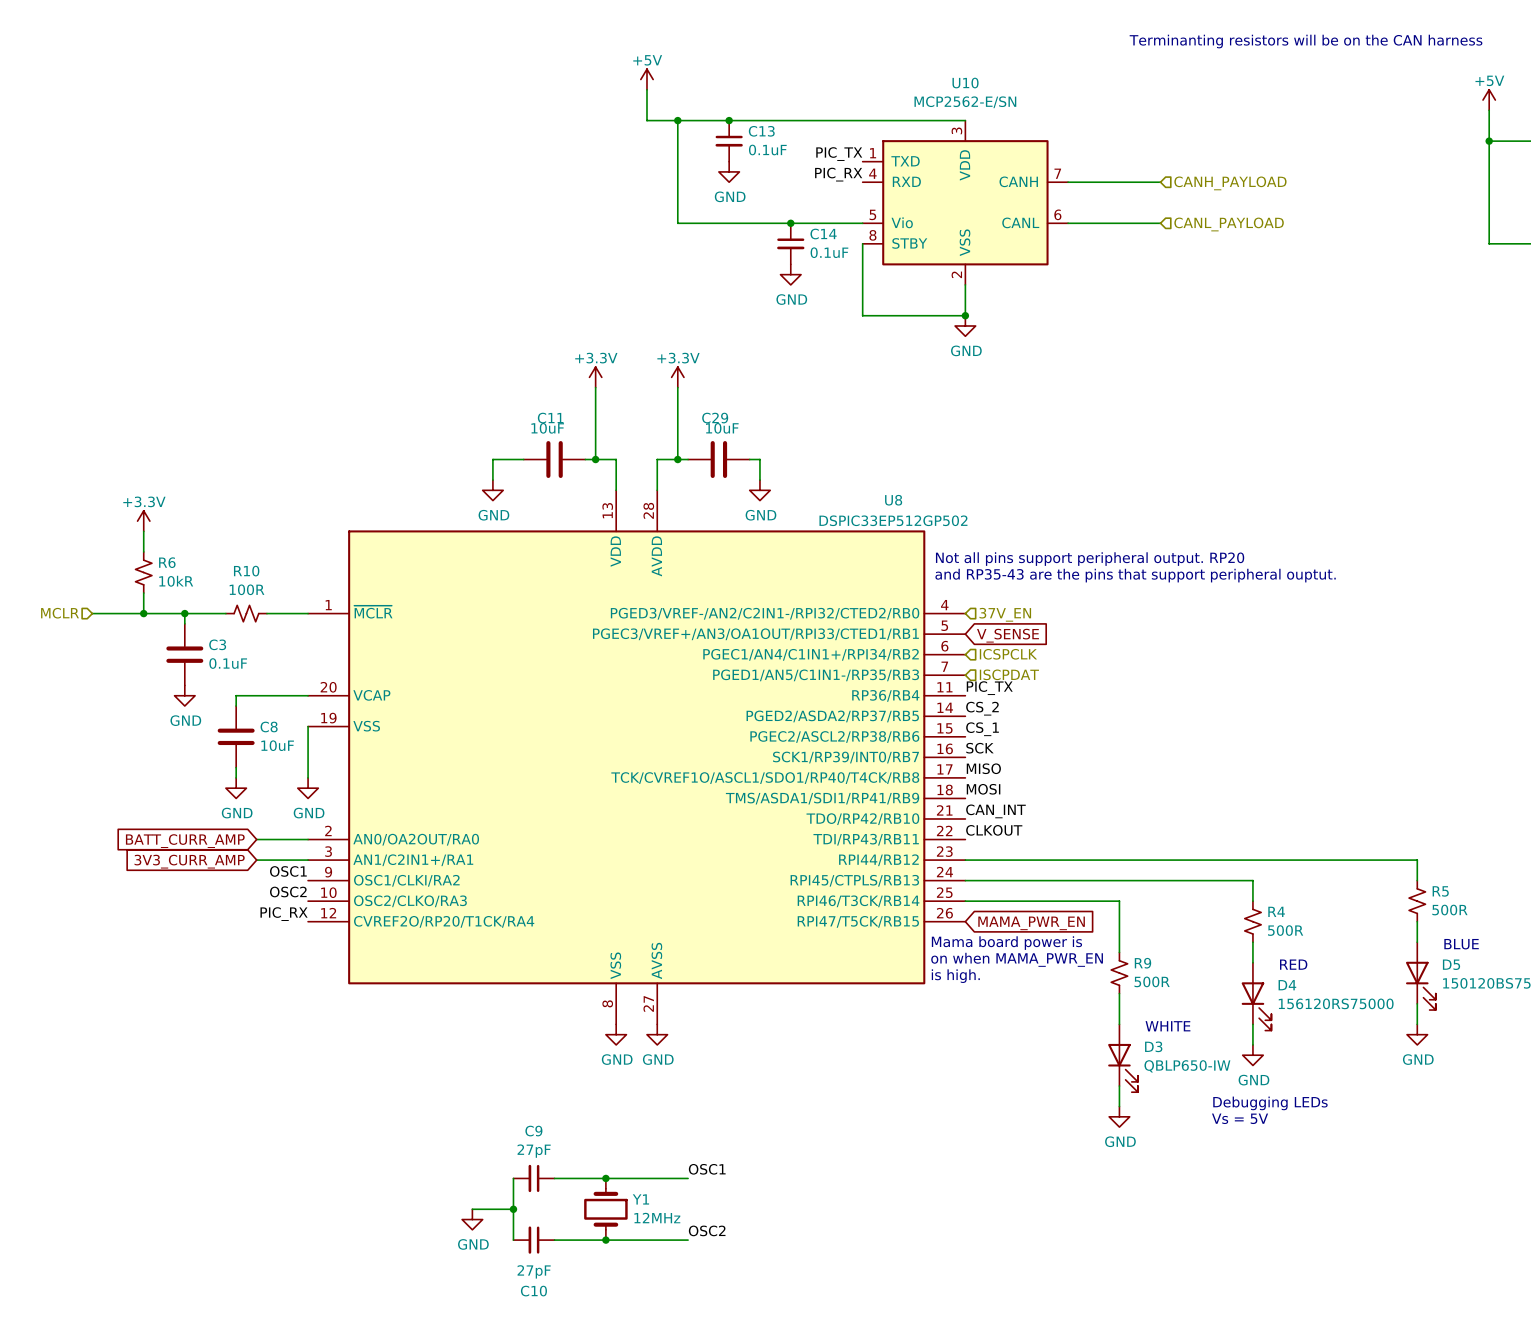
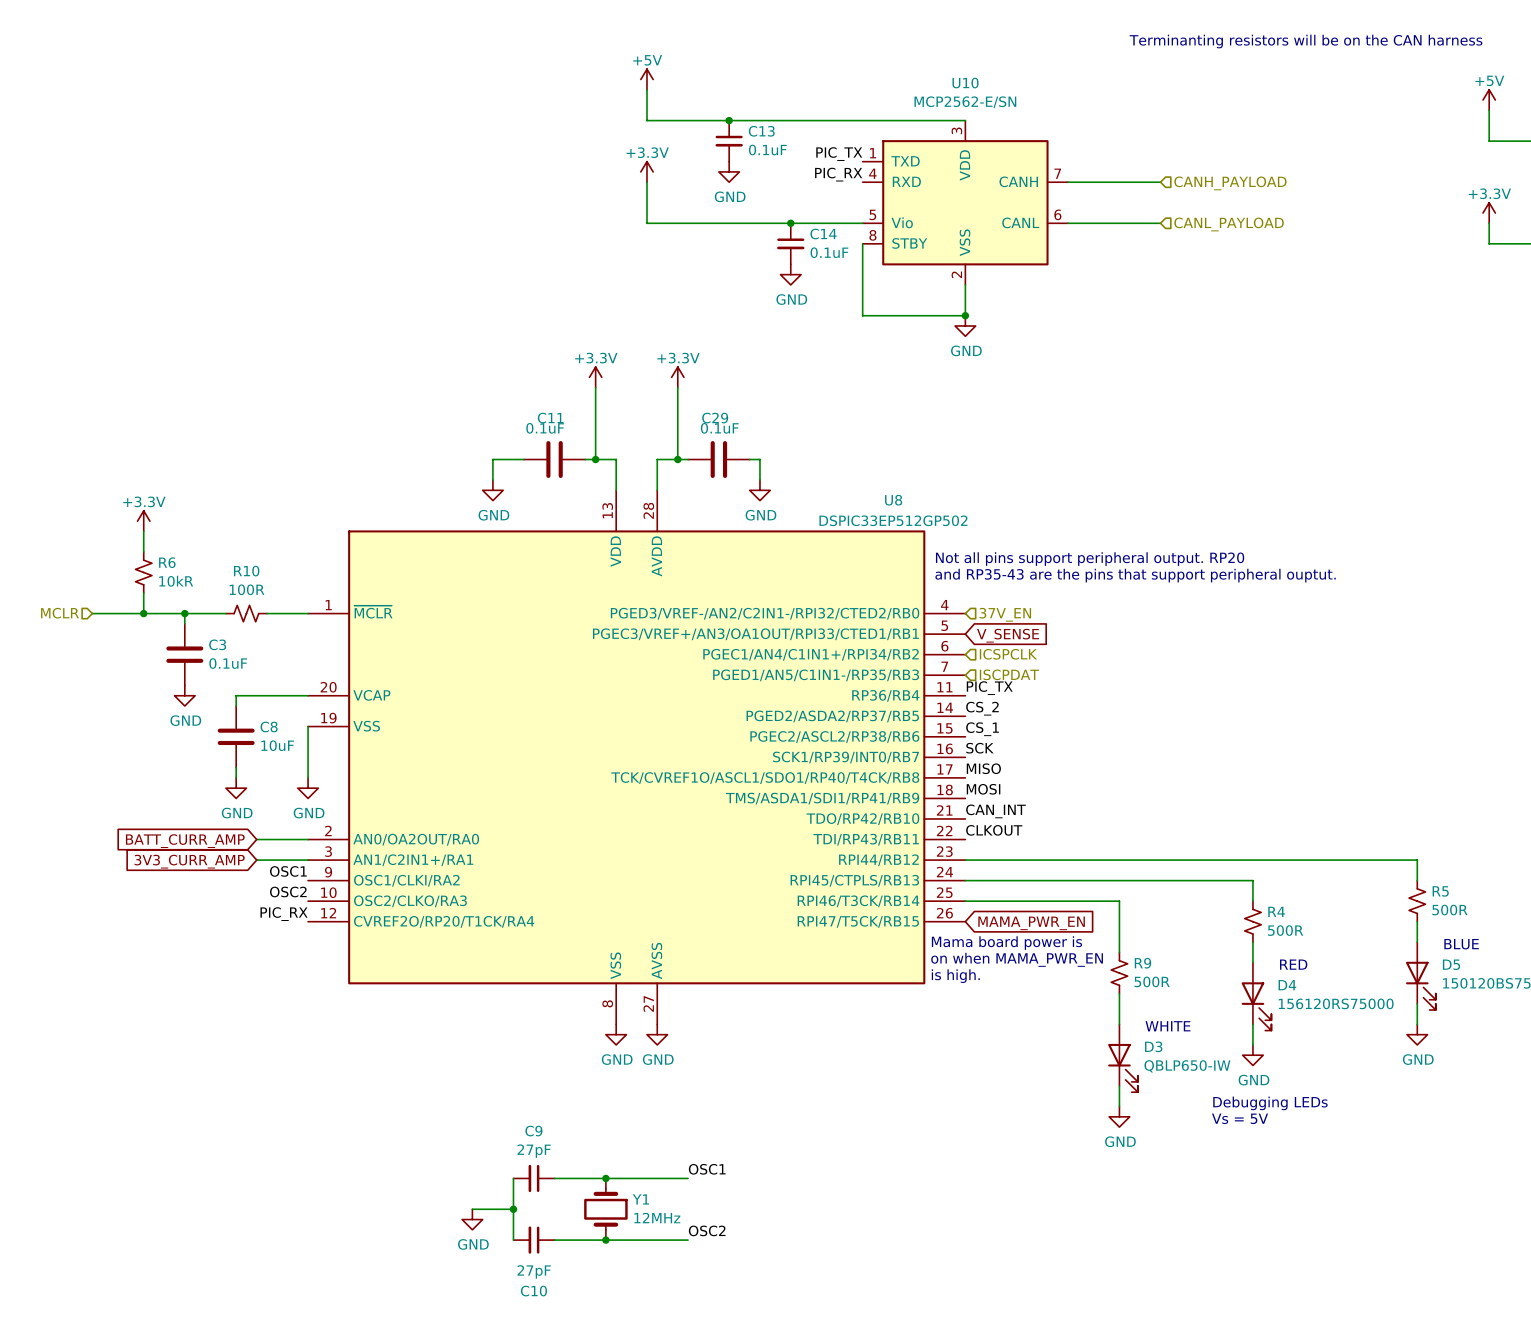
wire: (677, 120) (677, 223) -> (646, 182) (646, 223) (677, 223)
junction: (677, 120) -> none
wire: (1489, 141) (1489, 223) -> none
junction: (1489, 141) -> none
power symbol: none -> +3.3V (646, 171)
power symbol: none -> +3.3V (1489, 213)
C11 value: 10uF (547, 428) -> 0.1uF (545, 428)
C29 value: 10uF (722, 428) -> 0.1uF (719, 428)

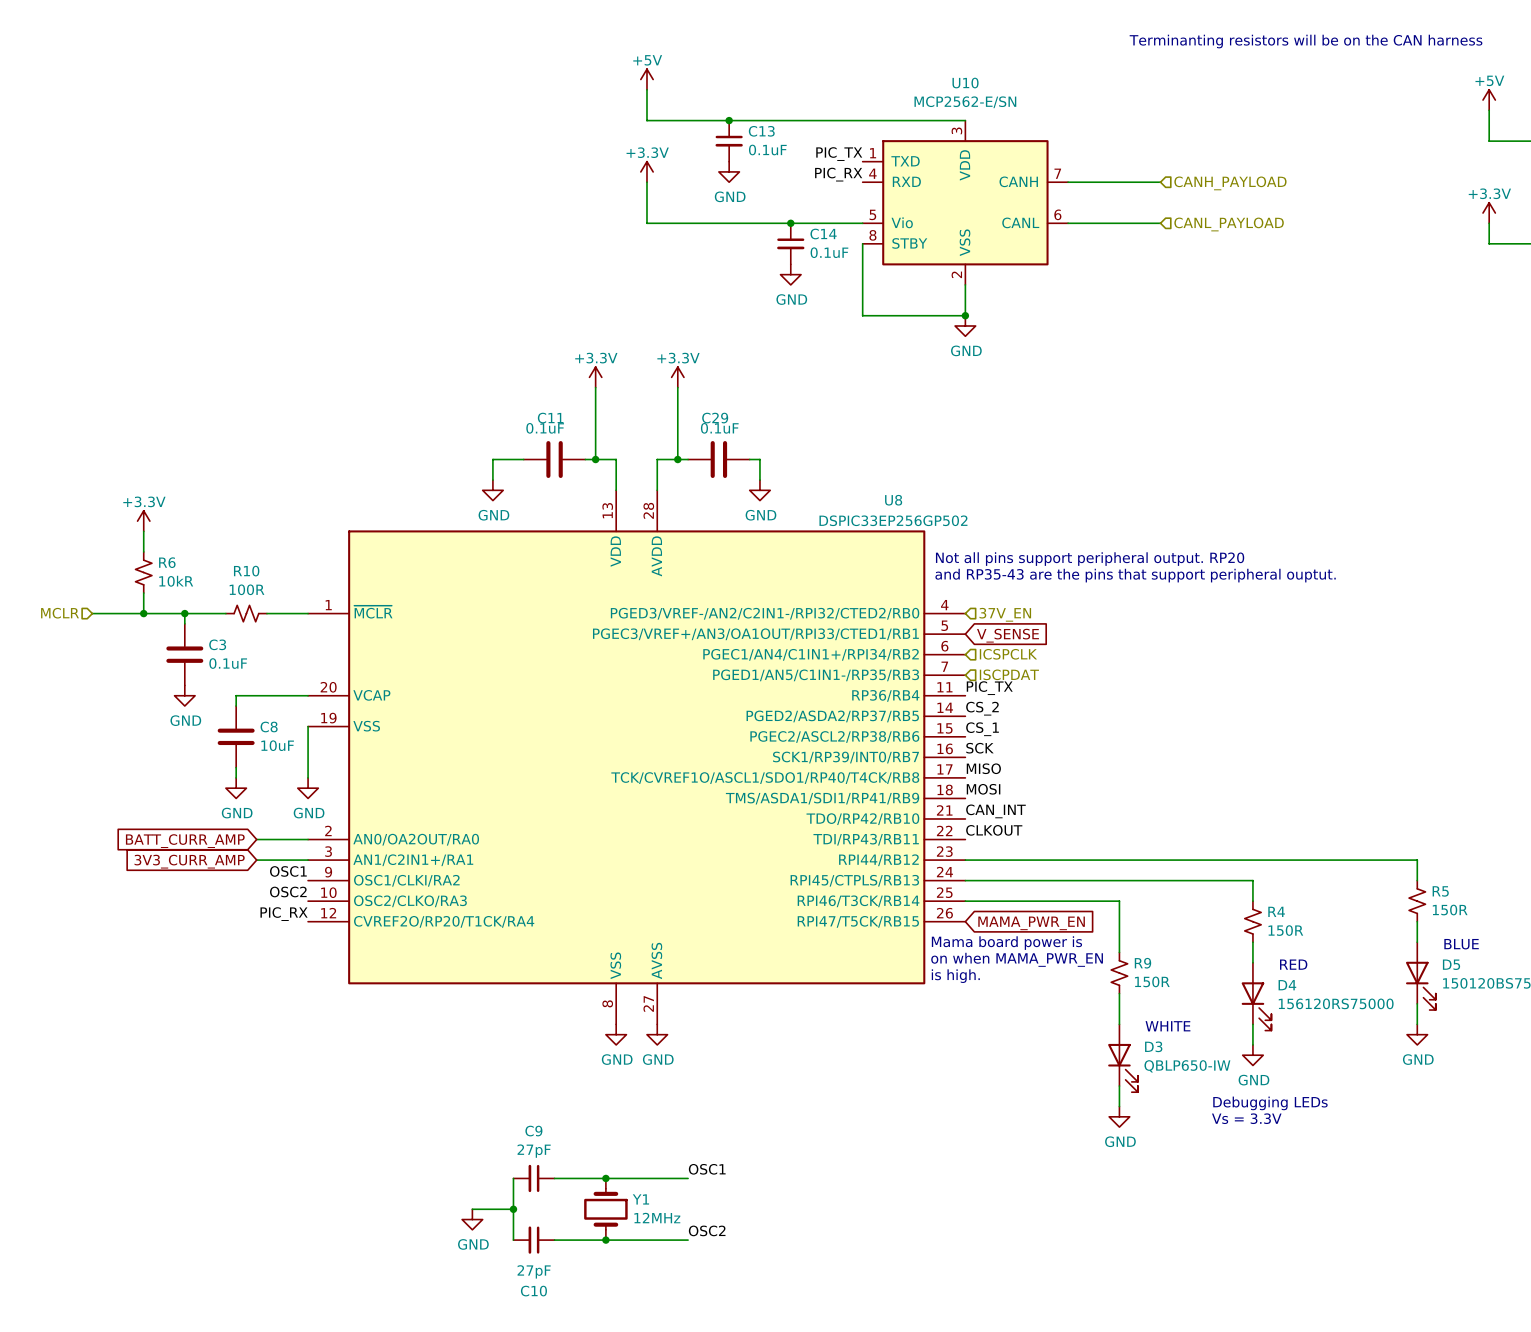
U8 value: DSPIC33EP512GP502 (893, 520) -> DSPIC33EP256GP502 (893, 520)
R5 value: 500R (1449, 910) -> 150R (1450, 910)
R4 value: 500R (1285, 930) -> 150R (1285, 930)
R9 value: 500R (1152, 981) -> 150R (1152, 981)
text: Vs = 5V (1240, 1118) -> Vs = 3.3V (1246, 1118)

